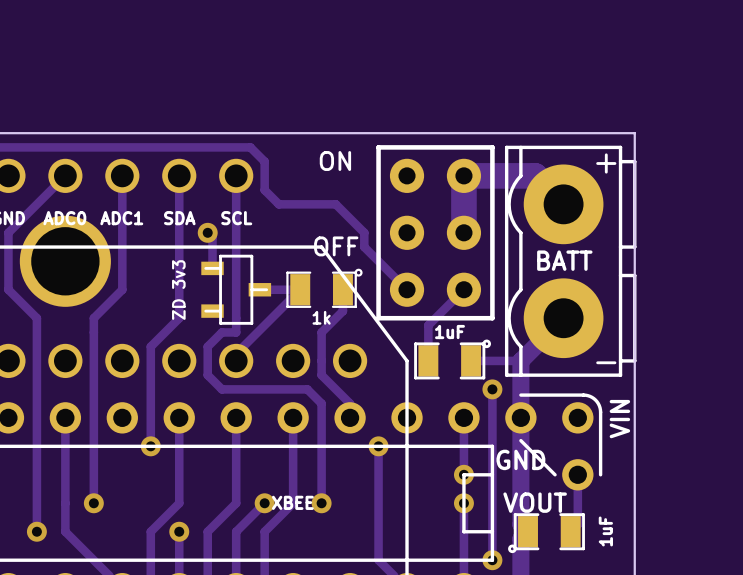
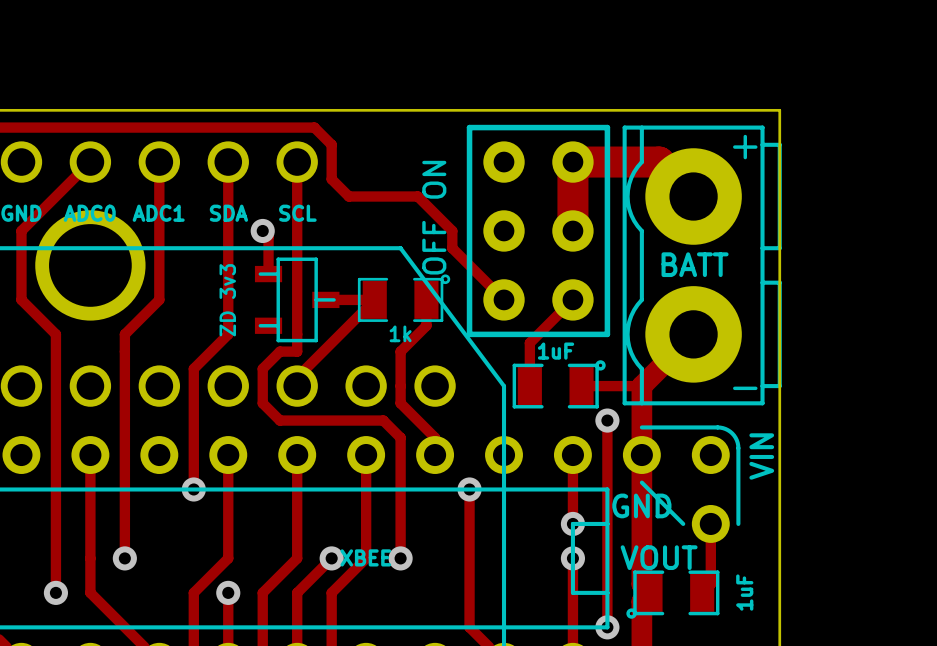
text rotation: 0° (335, 161) -> 90° counterclockwise (434, 179)
text rotation: 0° (336, 246) -> 90° counterclockwise (434, 247)

